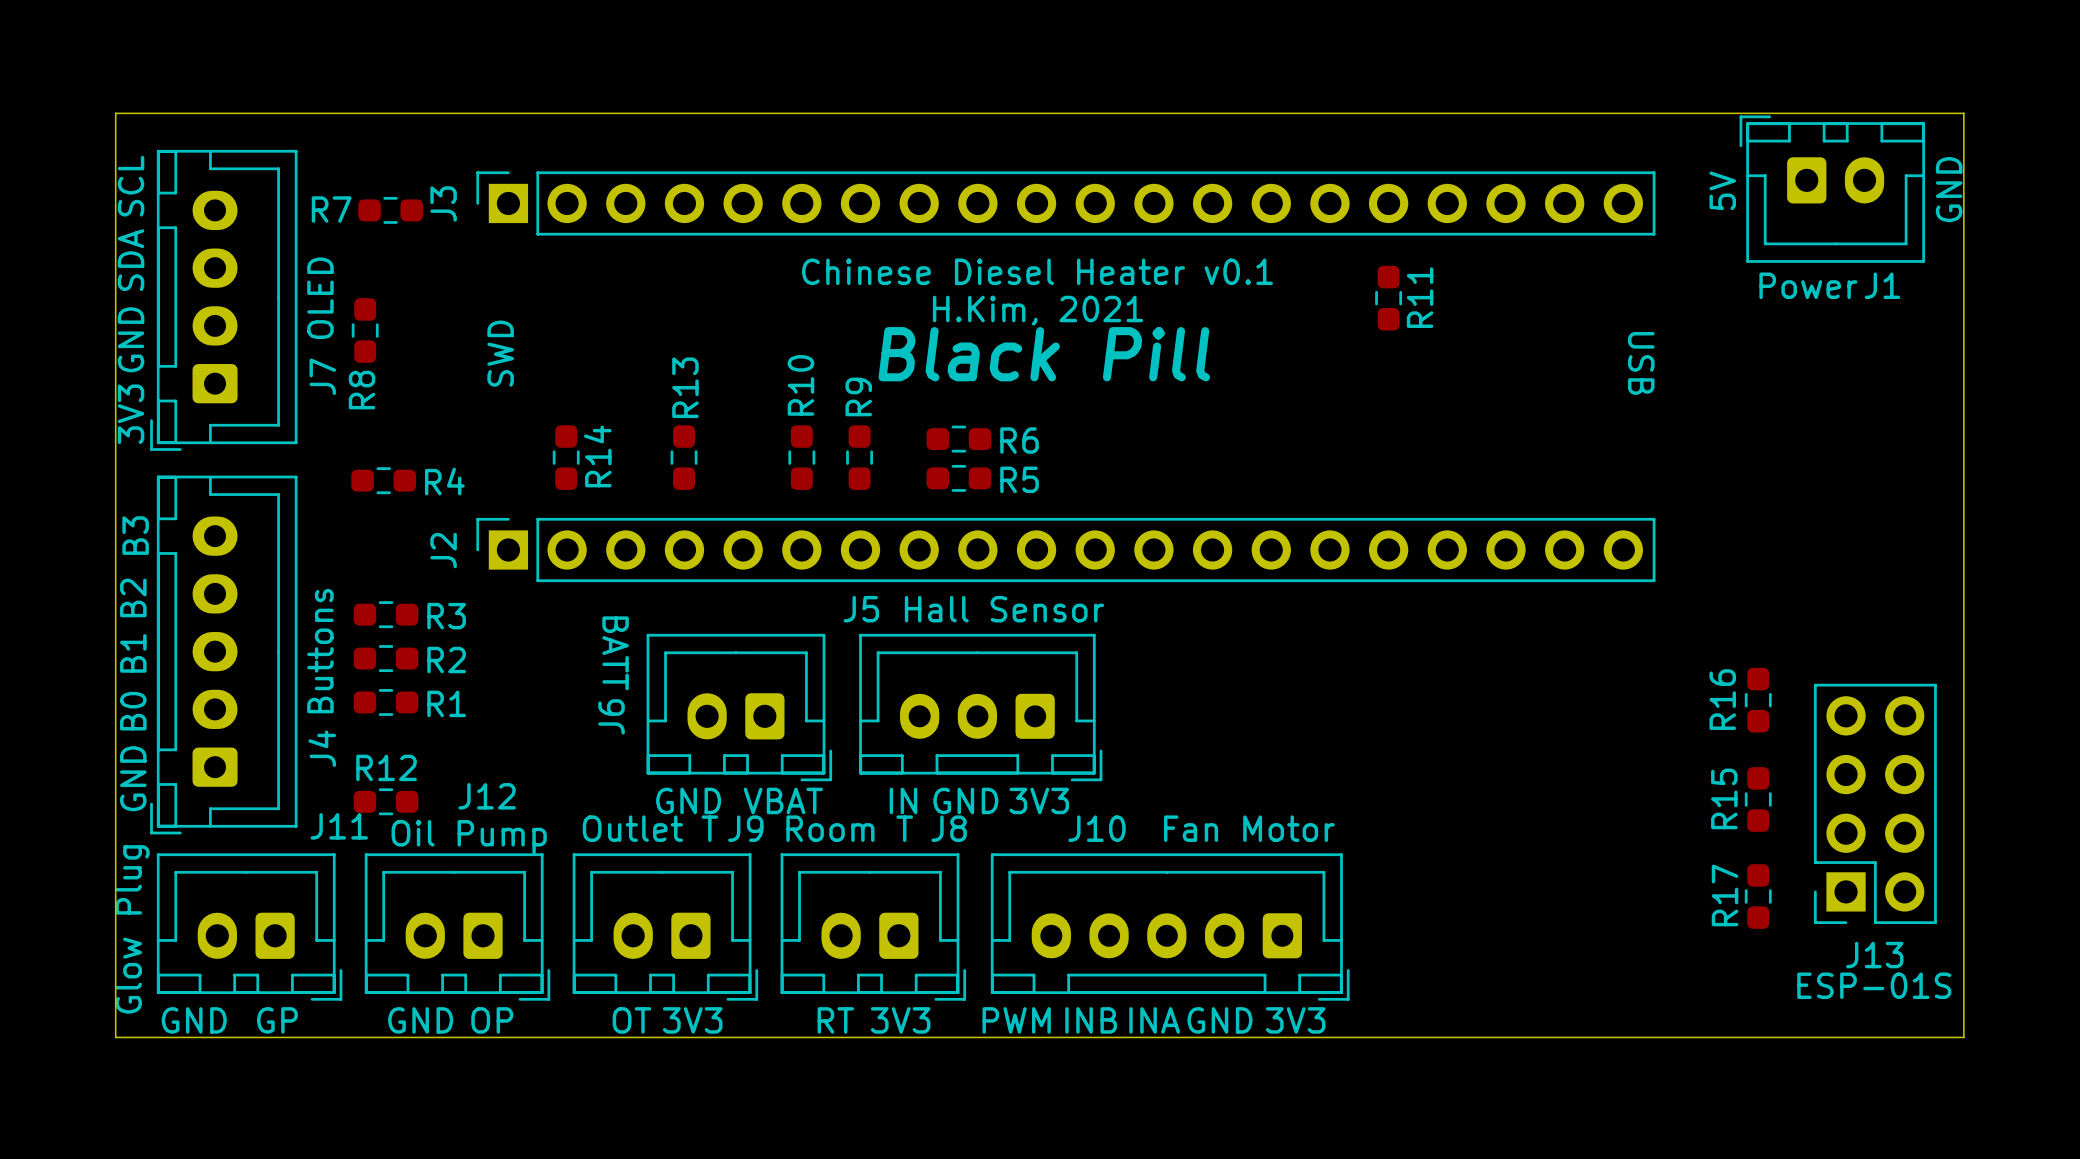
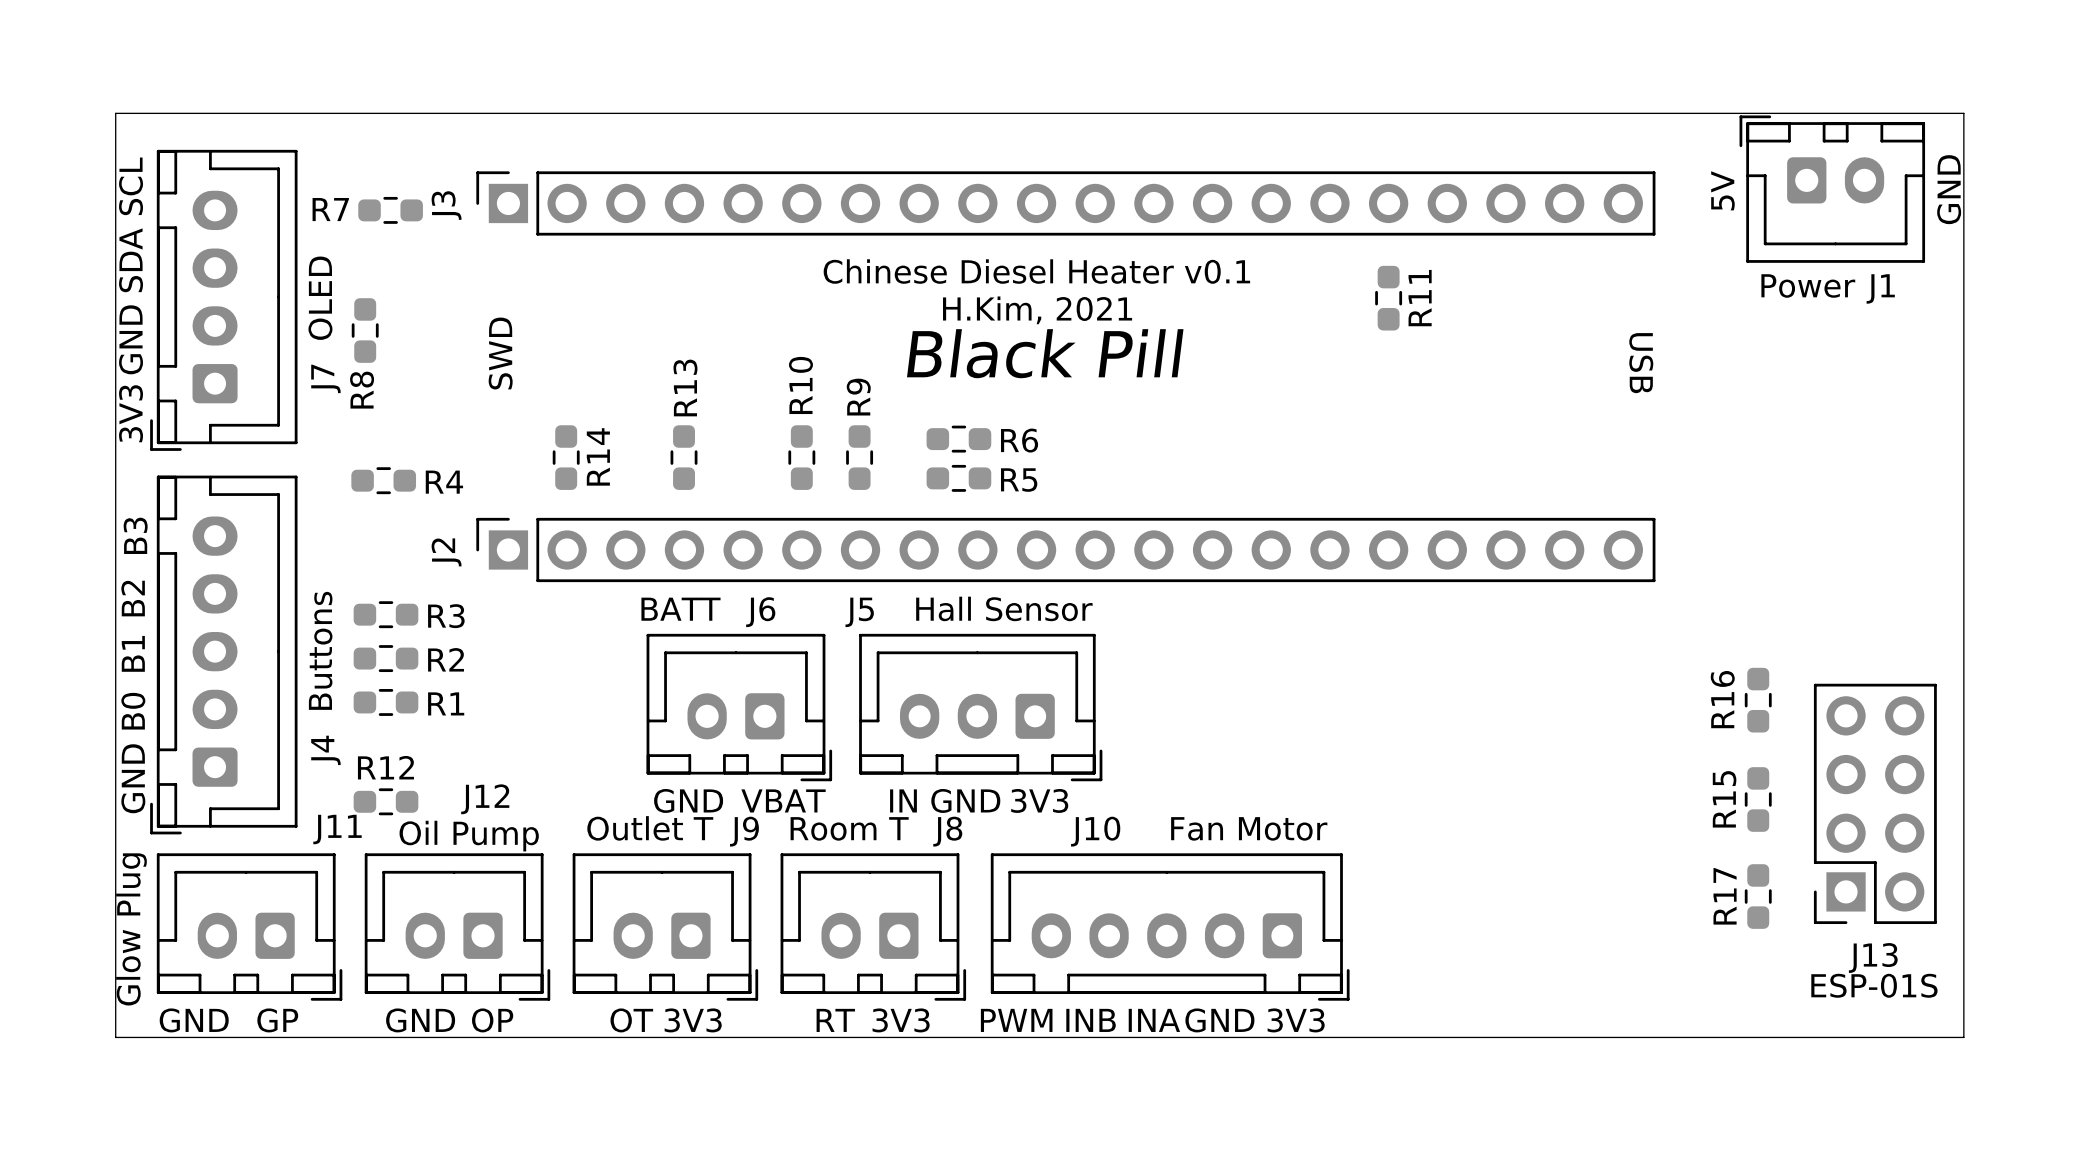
text rotation: 0° (615, 653) -> 90° counterclockwise (680, 609)
J6 name rotation: 0° (611, 716) -> 90° clockwise (760, 612)
J6 name position: J6 (611, 716) -> J6 (760, 612)

